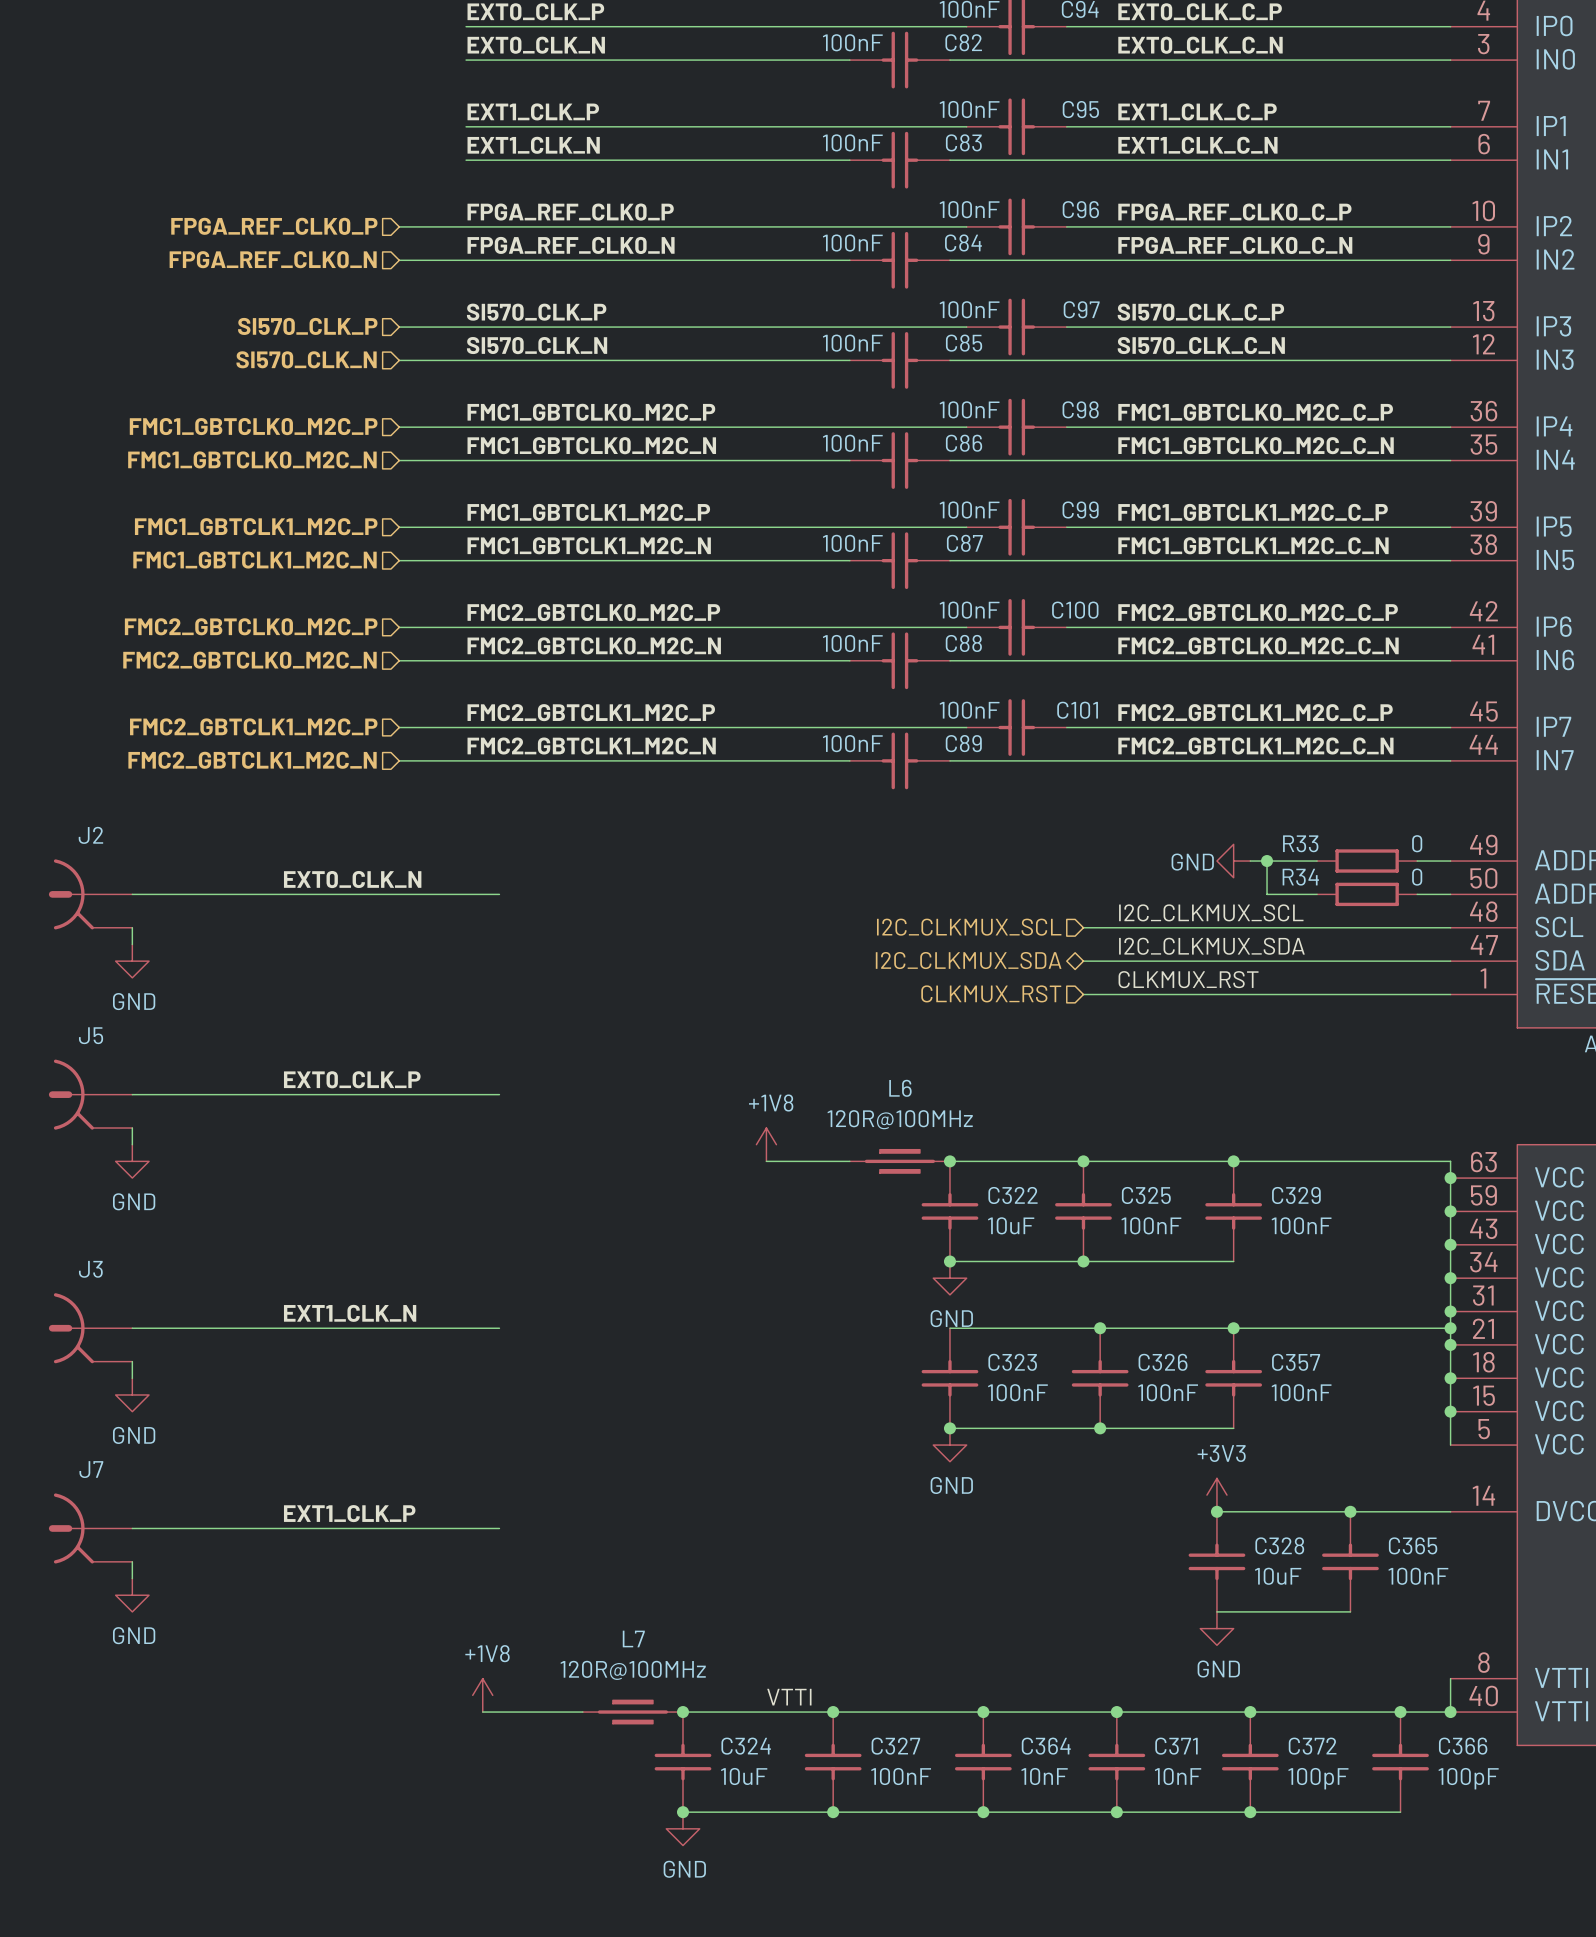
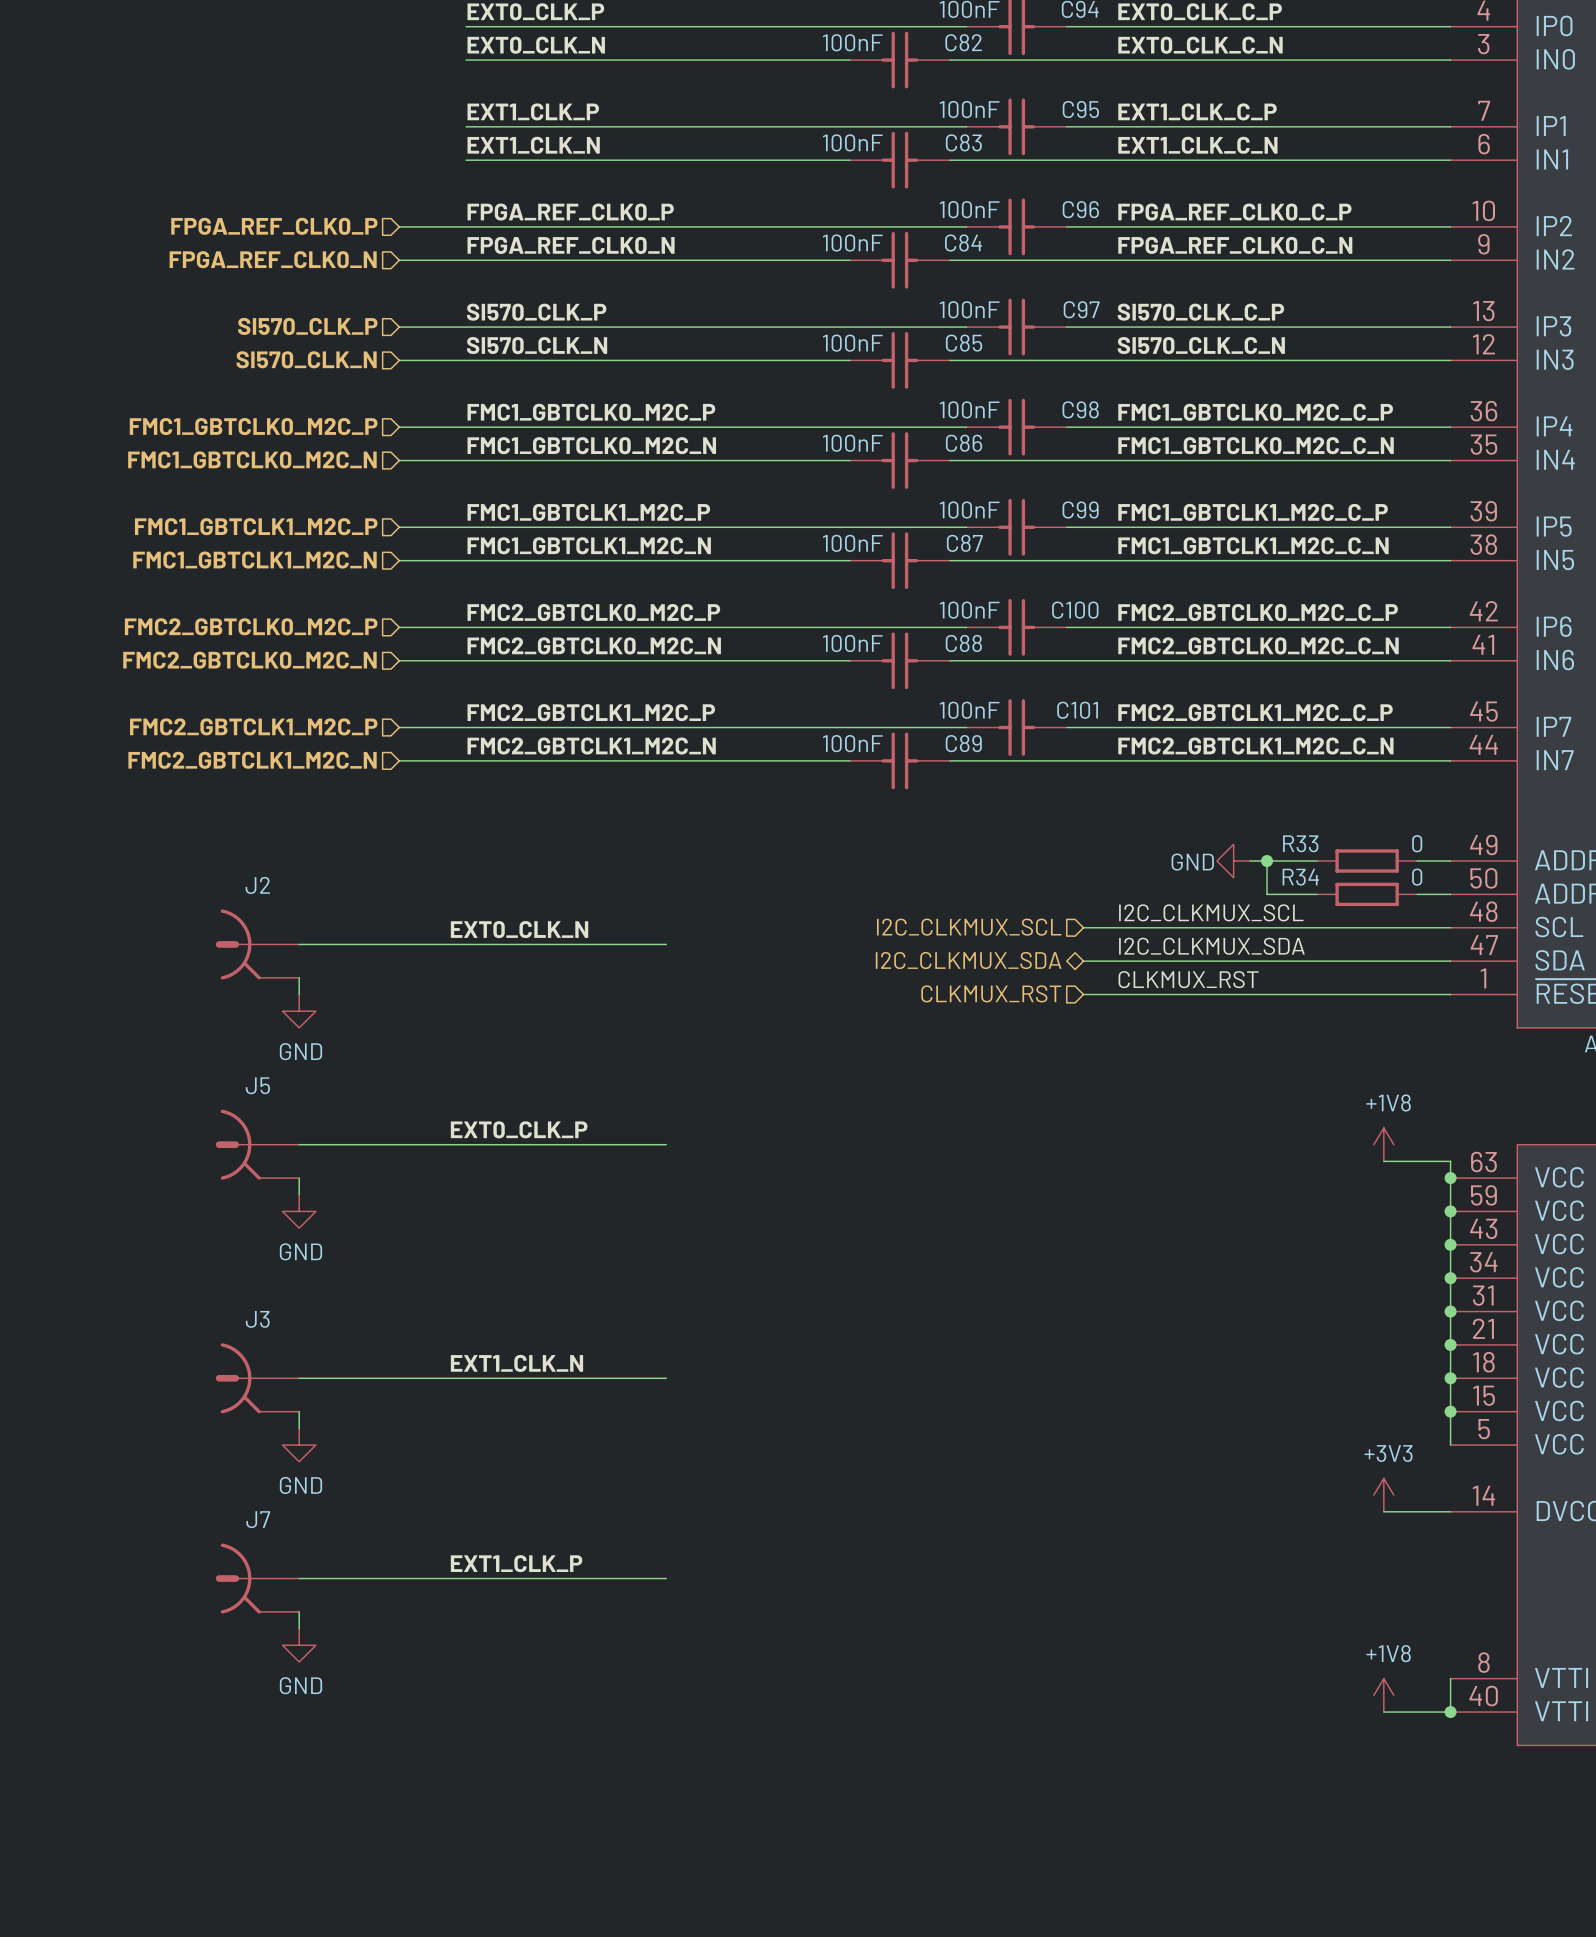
label position: EXT0_CLK_N (352, 879) -> EXT0_CLK_N (519, 929)
J2 position: (90, 894) -> (257, 944)
wire: (132, 894) (499, 894) -> (299, 944) (666, 944)
wire: (132, 927) (132, 944) -> (299, 977) (299, 994)
power symbol: GND (132, 961) -> none
power symbol: none -> GND (299, 1011)
label position: EXT0_CLK_P (352, 1079) -> EXT0_CLK_P (519, 1129)
J5 position: (90, 1094) -> (257, 1144)
wire: (132, 1094) (499, 1094) -> (299, 1144) (666, 1144)
wire: (132, 1128) (132, 1144) -> (299, 1178) (299, 1194)
power symbol: +1V8 (766, 1144) -> none
power symbol: none -> +1V8 (1383, 1144)
power symbol: GND (132, 1161) -> none
wire: (766, 1161) (849, 1161) -> none
L6: (899, 1161) -> none
wire: (949, 1161) (1383, 1161) -> none
junction: (949, 1161) -> none
junction: (1083, 1161) -> none
junction: (1233, 1161) -> none
power symbol: none -> GND (299, 1211)
C322: (949, 1211) -> none
C325: (1083, 1211) -> none
C329: (1233, 1211) -> none
wire: (949, 1261) (1233, 1261) -> none
junction: (949, 1261) -> none
junction: (1083, 1261) -> none
power symbol: GND (949, 1278) -> none
label position: EXT1_CLK_N (350, 1313) -> EXT1_CLK_N (516, 1363)
J3 position: (90, 1328) -> (257, 1378)
wire: (132, 1328) (499, 1328) -> (299, 1378) (666, 1378)
wire: (949, 1328) (1450, 1328) -> none
junction: (1100, 1328) -> none
junction: (1233, 1328) -> none
junction: (1450, 1328) -> none
wire: (132, 1361) (132, 1378) -> (299, 1411) (299, 1428)
C323: (949, 1378) -> none
C326: (1100, 1378) -> none
C357: (1233, 1378) -> none
power symbol: GND (132, 1394) -> none
wire: (949, 1428) (1233, 1428) -> none
junction: (949, 1428) -> none
junction: (1100, 1428) -> none
power symbol: none -> GND (299, 1445)
power symbol: GND (949, 1445) -> none
power symbol position: +3V3 (1216, 1495) -> +3V3 (1383, 1495)
wire: (1216, 1511) (1383, 1511) -> none
junction: (1216, 1511) -> none
junction: (1350, 1511) -> none
label position: EXT1_CLK_P (349, 1513) -> EXT1_CLK_P (516, 1563)
J7 position: (90, 1528) -> (257, 1578)
wire: (132, 1528) (499, 1528) -> (299, 1578) (666, 1578)
wire: (132, 1561) (132, 1578) -> (299, 1611) (299, 1628)
C328: (1216, 1561) -> none
C365: (1350, 1561) -> none
power symbol: GND (132, 1595) -> none
wire: (1216, 1611) (1350, 1611) -> none
power symbol: GND (1216, 1628) -> none
power symbol: none -> GND (299, 1645)
power symbol: +1V8 (482, 1695) -> none
power symbol: none -> +1V8 (1383, 1695)
label: VTTI (789, 1697) -> none
wire: (482, 1712) (582, 1712) -> none
L7: (632, 1712) -> none
wire: (682, 1712) (1383, 1712) -> none
junction: (682, 1712) -> none
junction: (833, 1712) -> none
junction: (983, 1712) -> none
junction: (1116, 1712) -> none
junction: (1250, 1712) -> none
junction: (1400, 1712) -> none
C324: (682, 1762) -> none
C327: (833, 1762) -> none
C364: (983, 1762) -> none
C371: (1116, 1762) -> none
C372: (1250, 1762) -> none
C366: (1400, 1762) -> none
wire: (682, 1812) (1400, 1812) -> none
junction: (682, 1812) -> none
junction: (833, 1812) -> none
junction: (983, 1812) -> none
junction: (1116, 1812) -> none
junction: (1250, 1812) -> none
power symbol: GND (682, 1828) -> none

